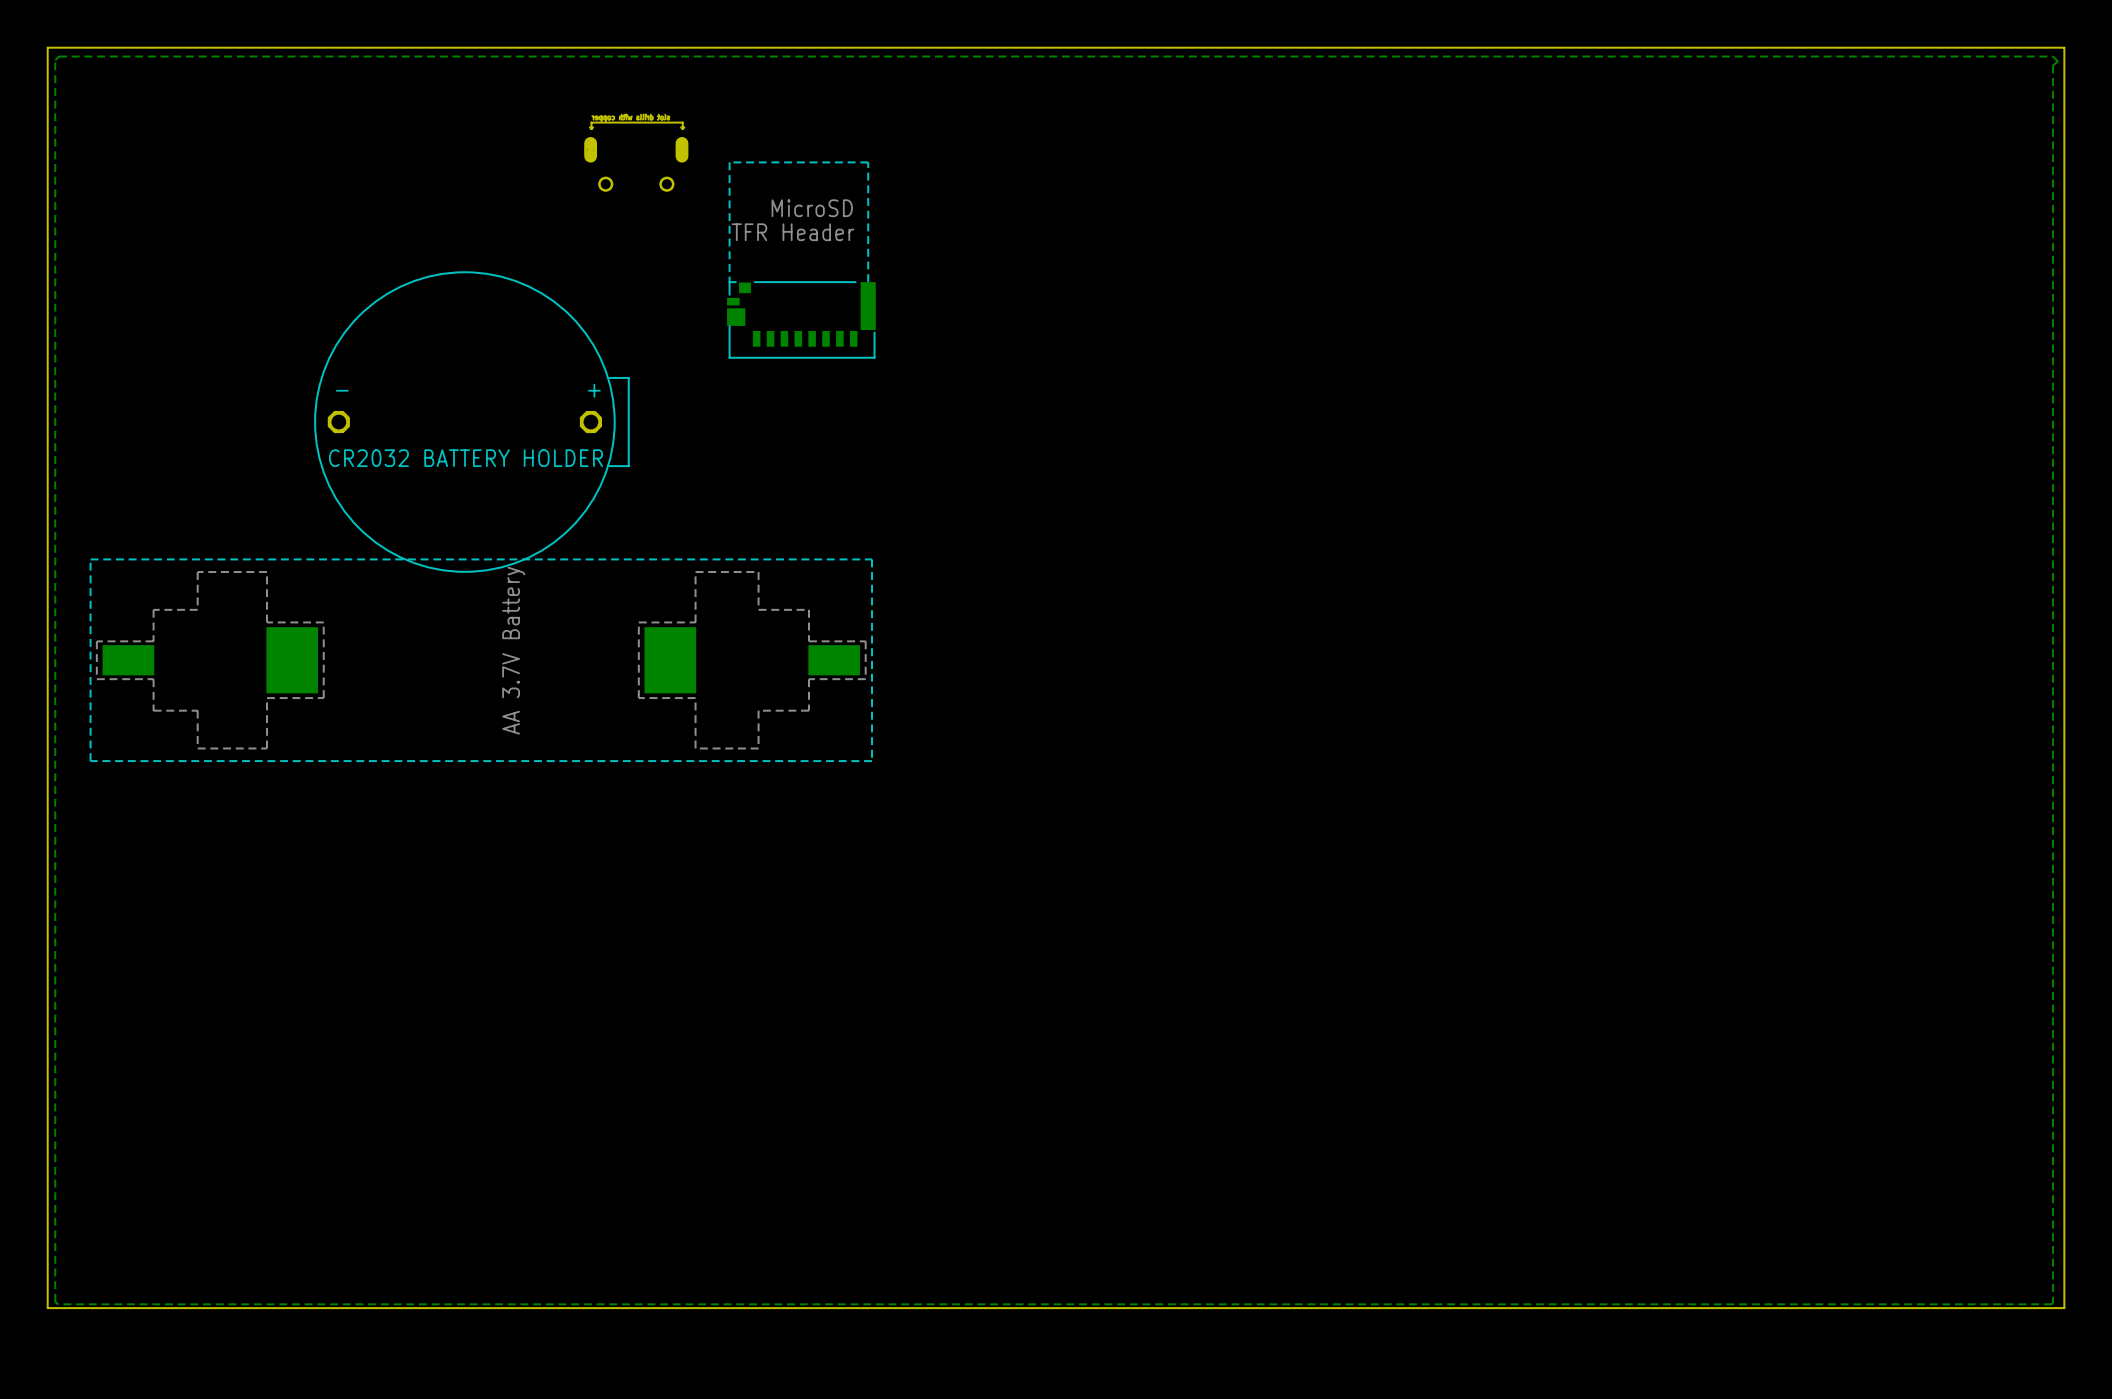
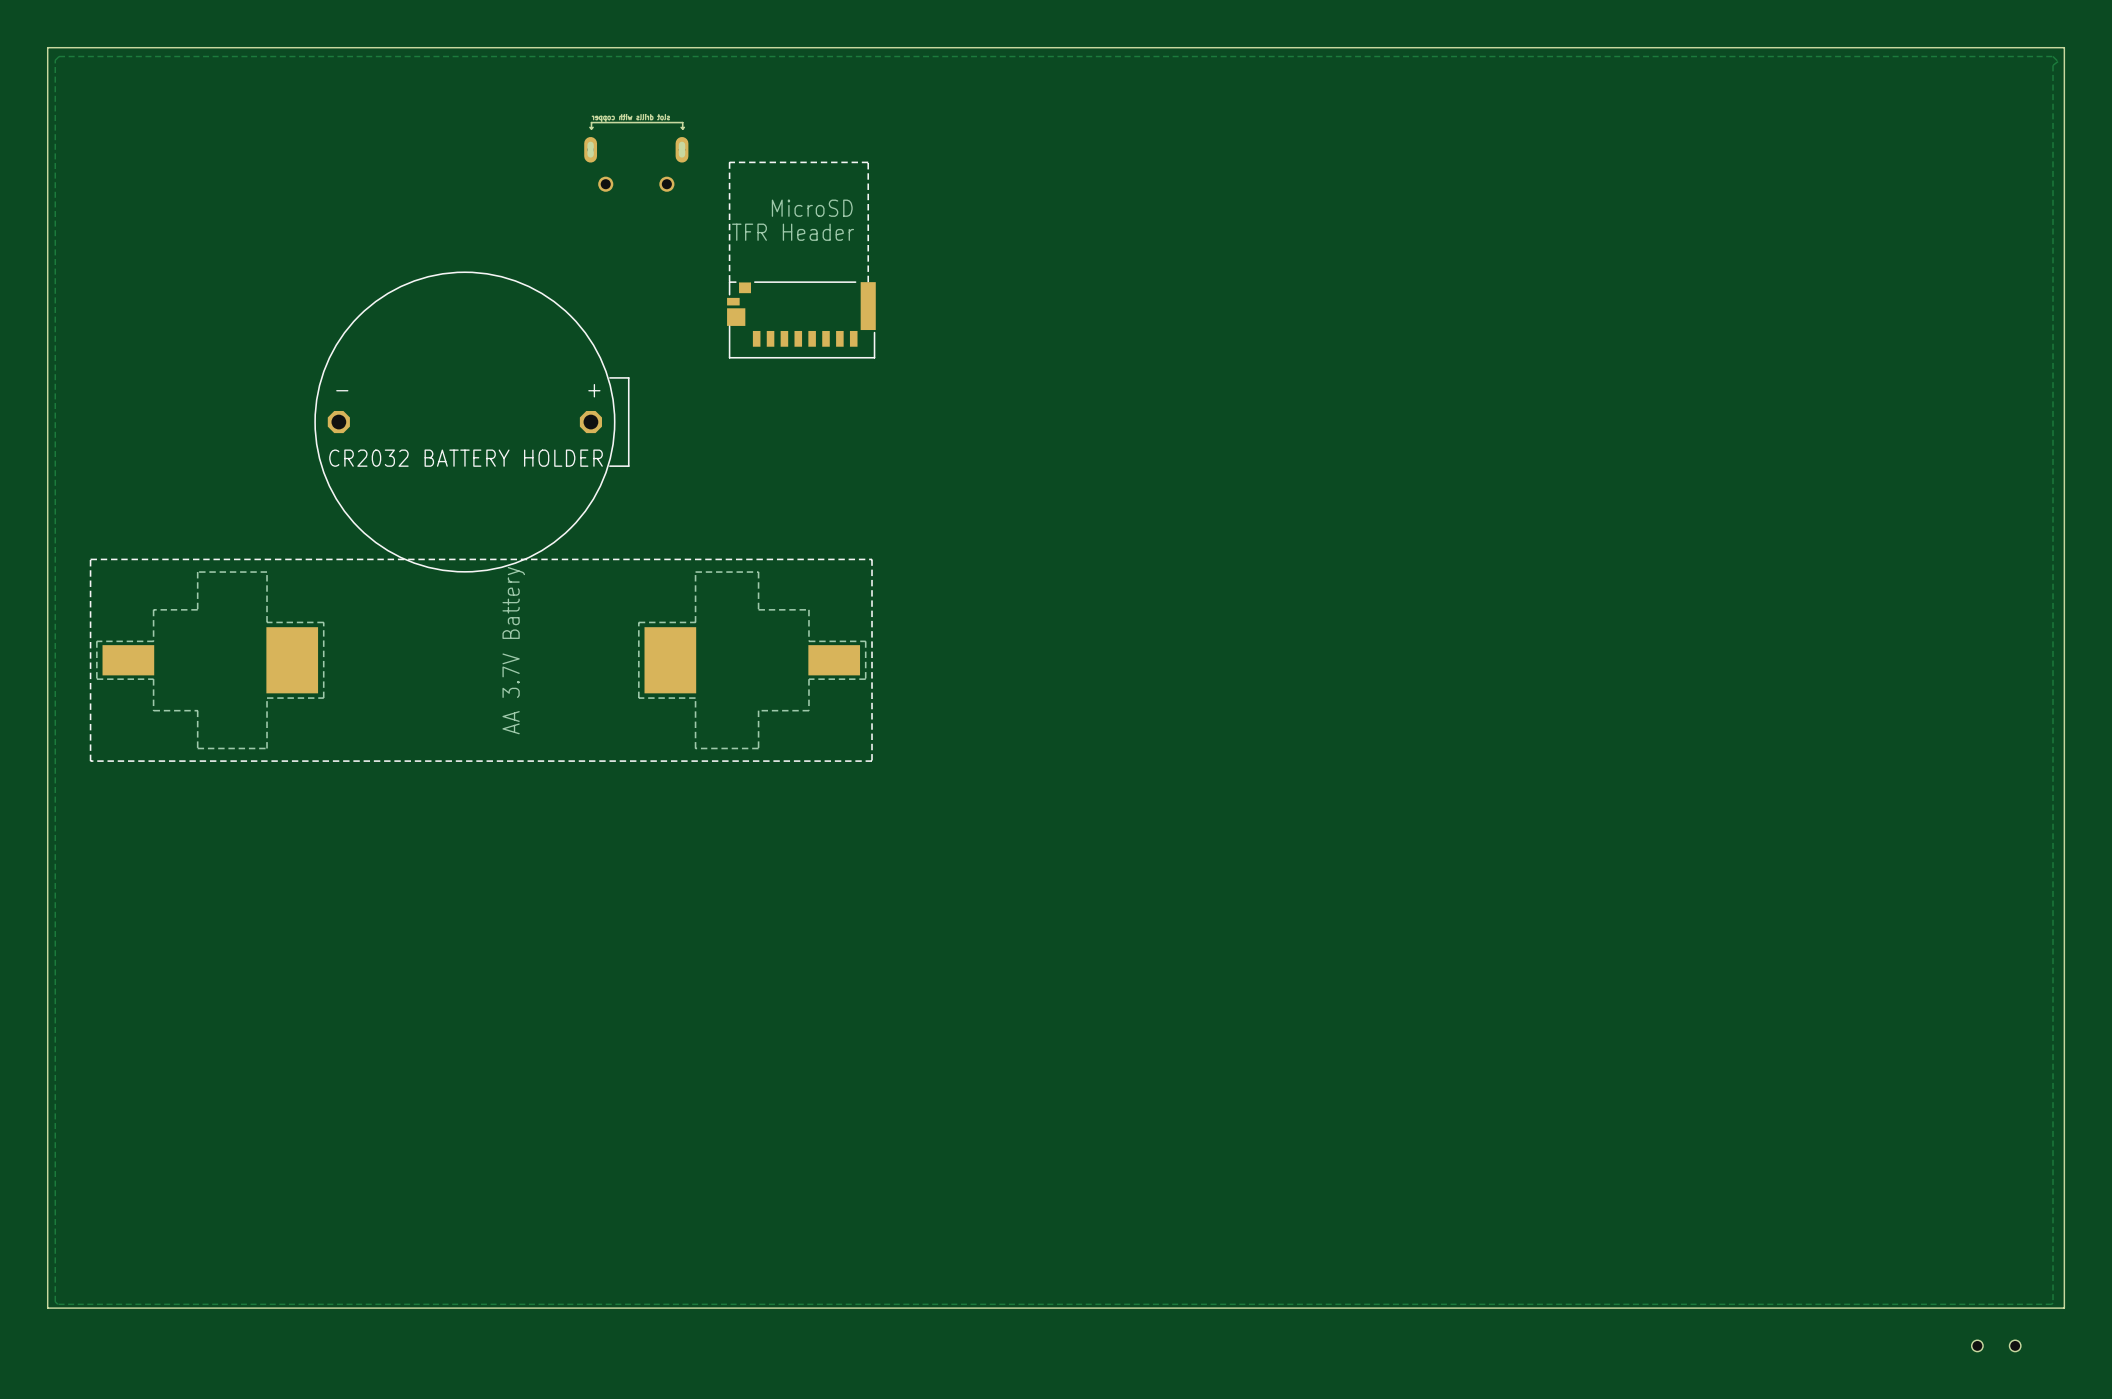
part: none -> (1996, 1345)

